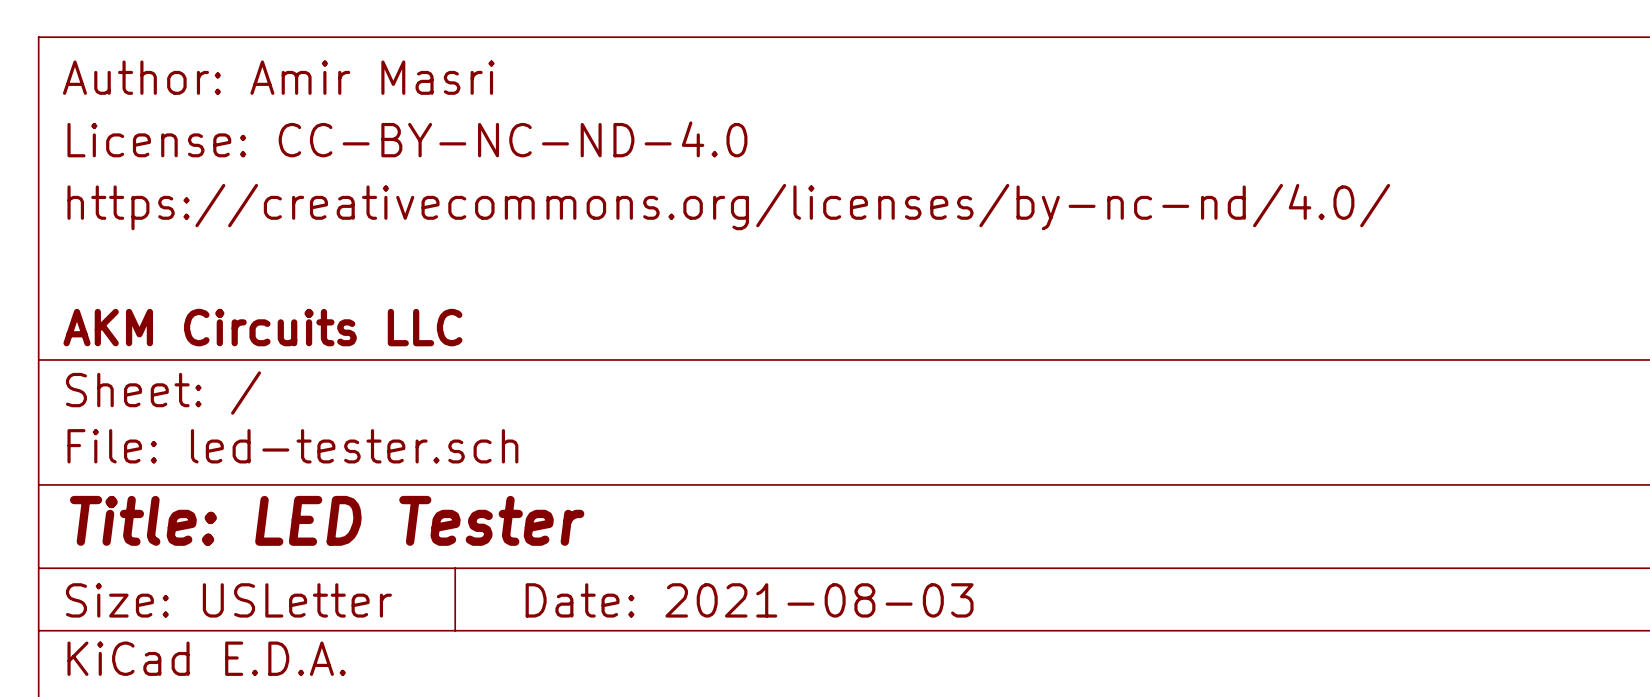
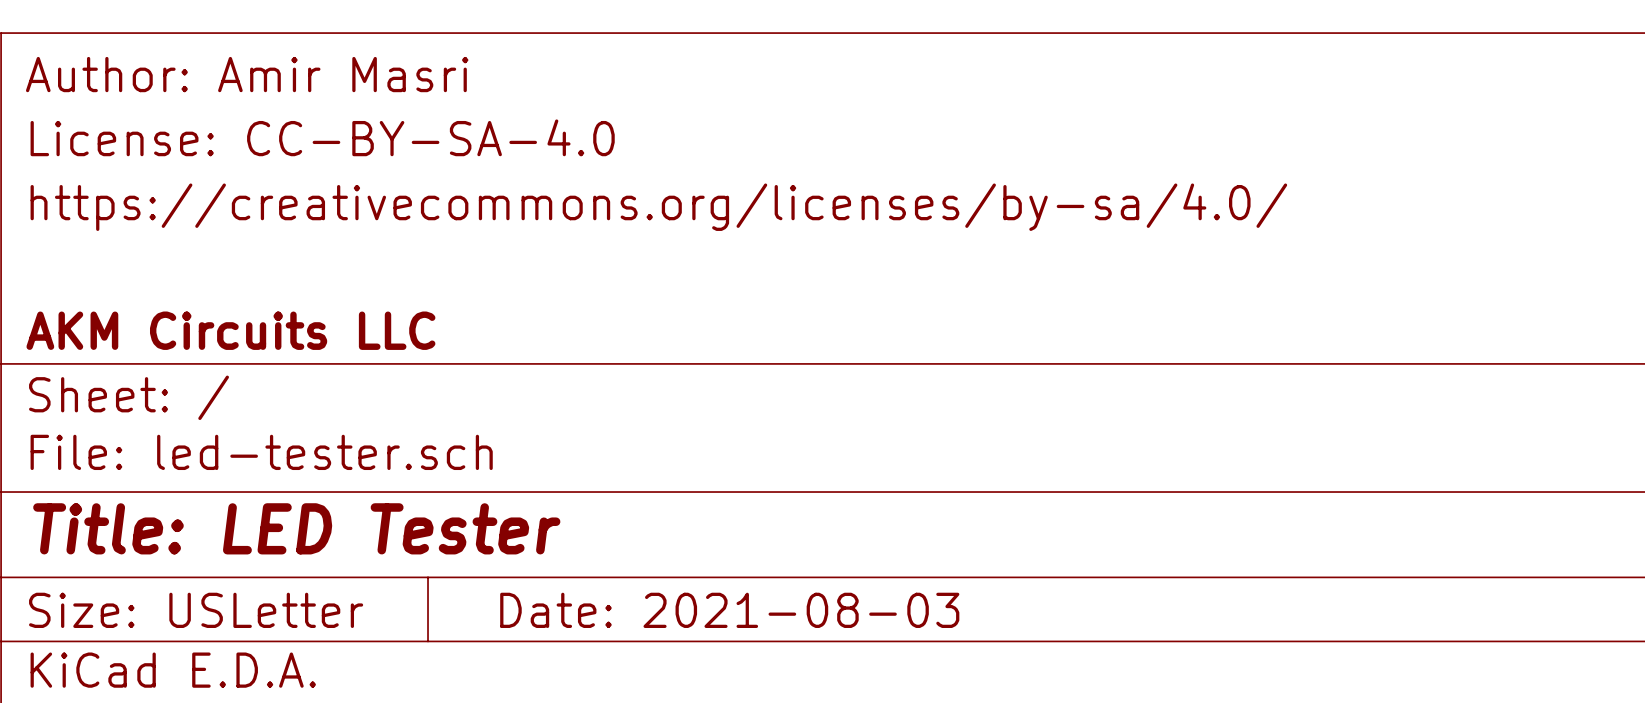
title block: License: CC-BY-NC-ND-4.0 (407, 139) -> License: CC-BY-SA-4.0 (322, 137)
title block: https://creativecommons.org/licenses/by-nc-nd/4.0/ (728, 207) -> https://creativecommons.org/licenses/by-sa/4.0/ (658, 207)

